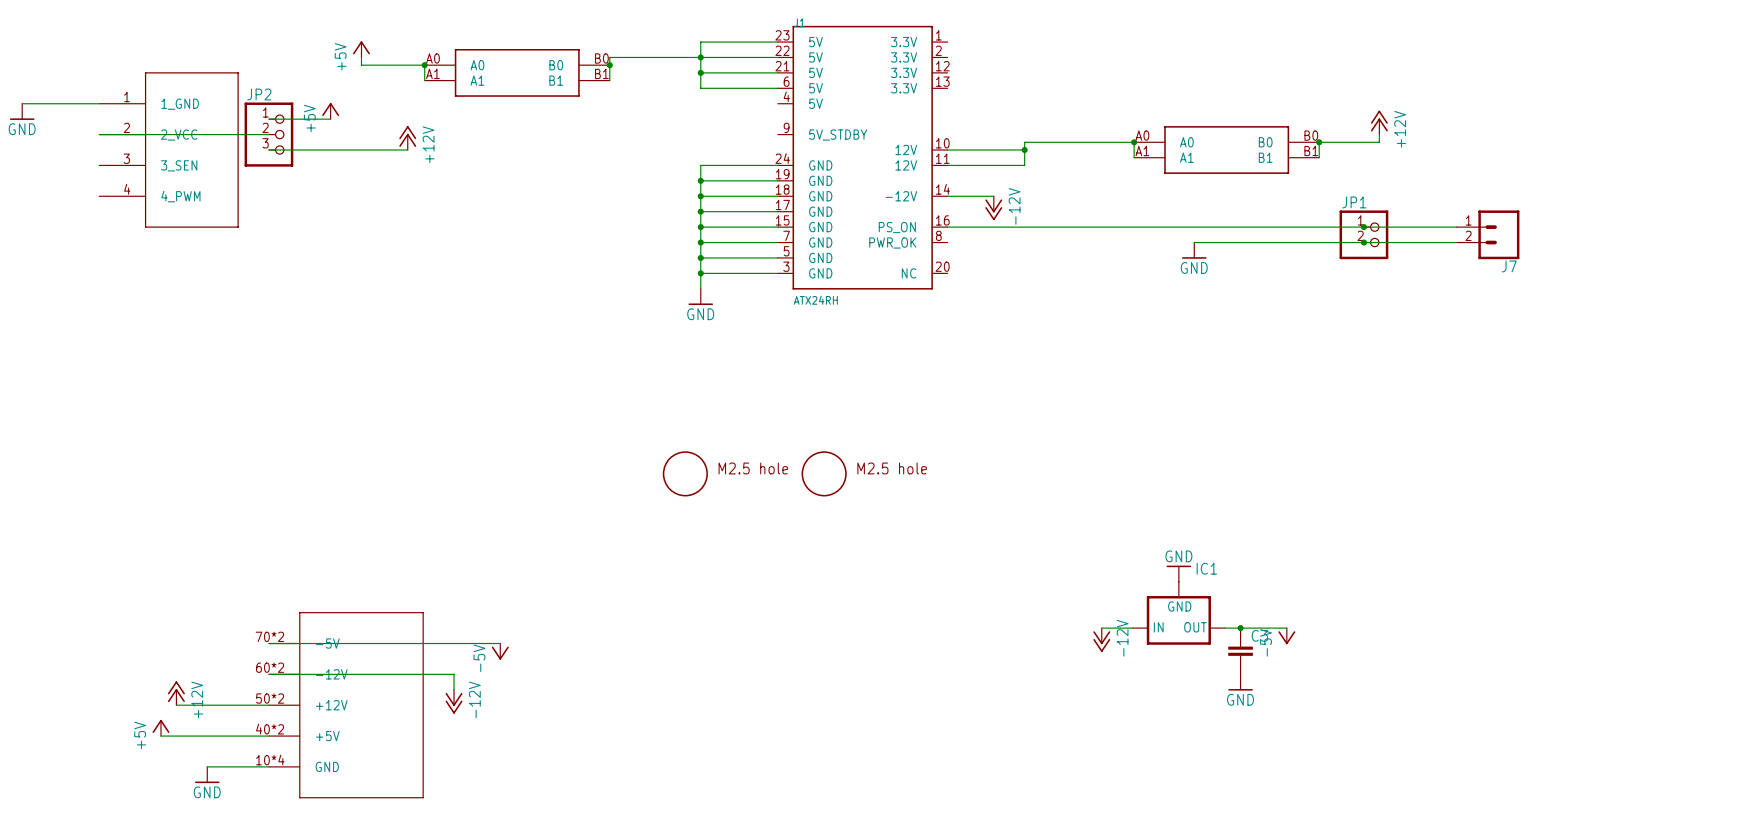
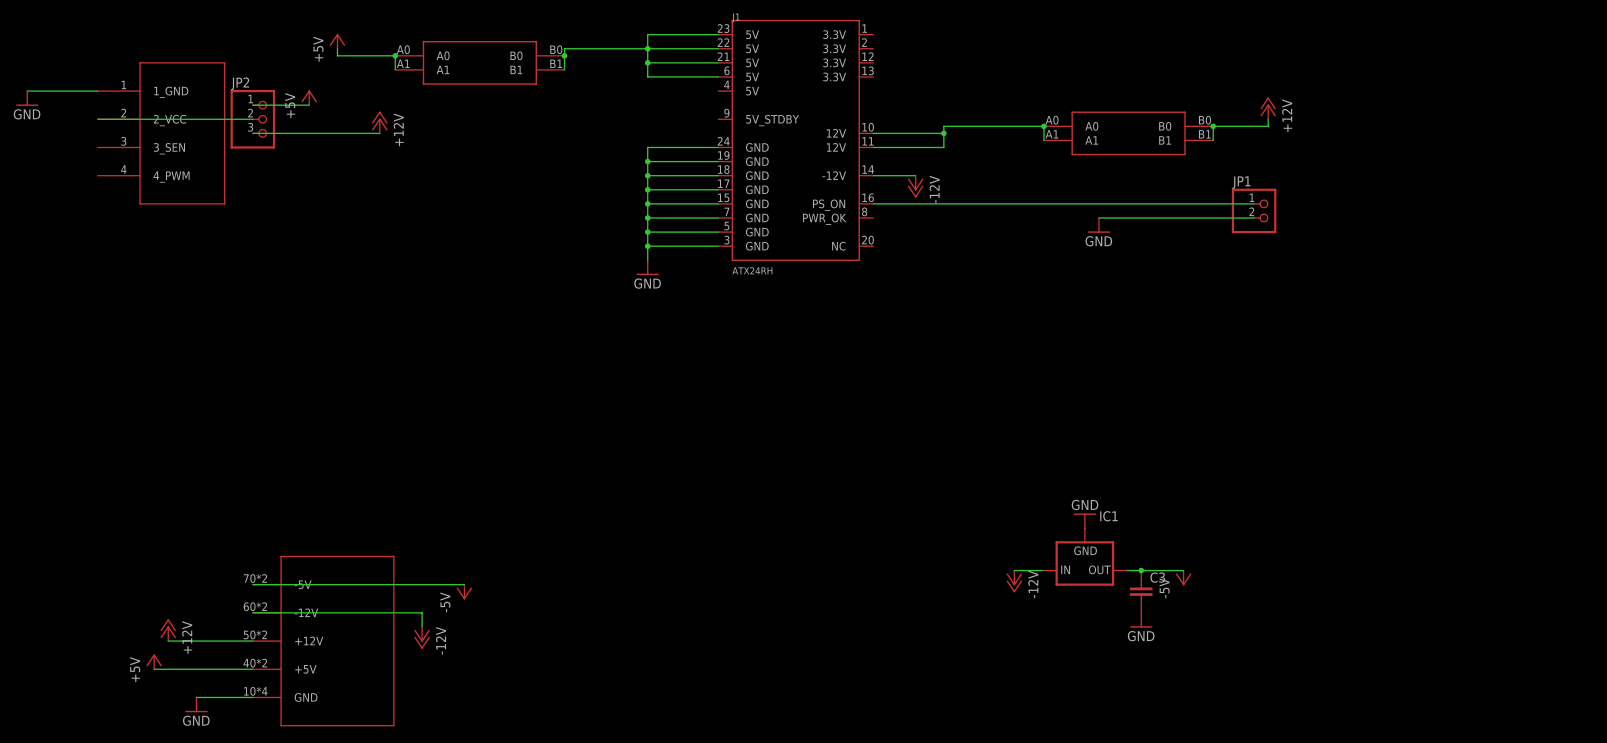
wire: (1363, 227) (1456, 227) -> none
junction: (1363, 227) -> none
J7: (1487, 234) -> none
wire: (1363, 242) (1456, 242) -> none
junction: (1363, 242) -> none
part: (685, 473) -> none
part: (824, 473) -> none

